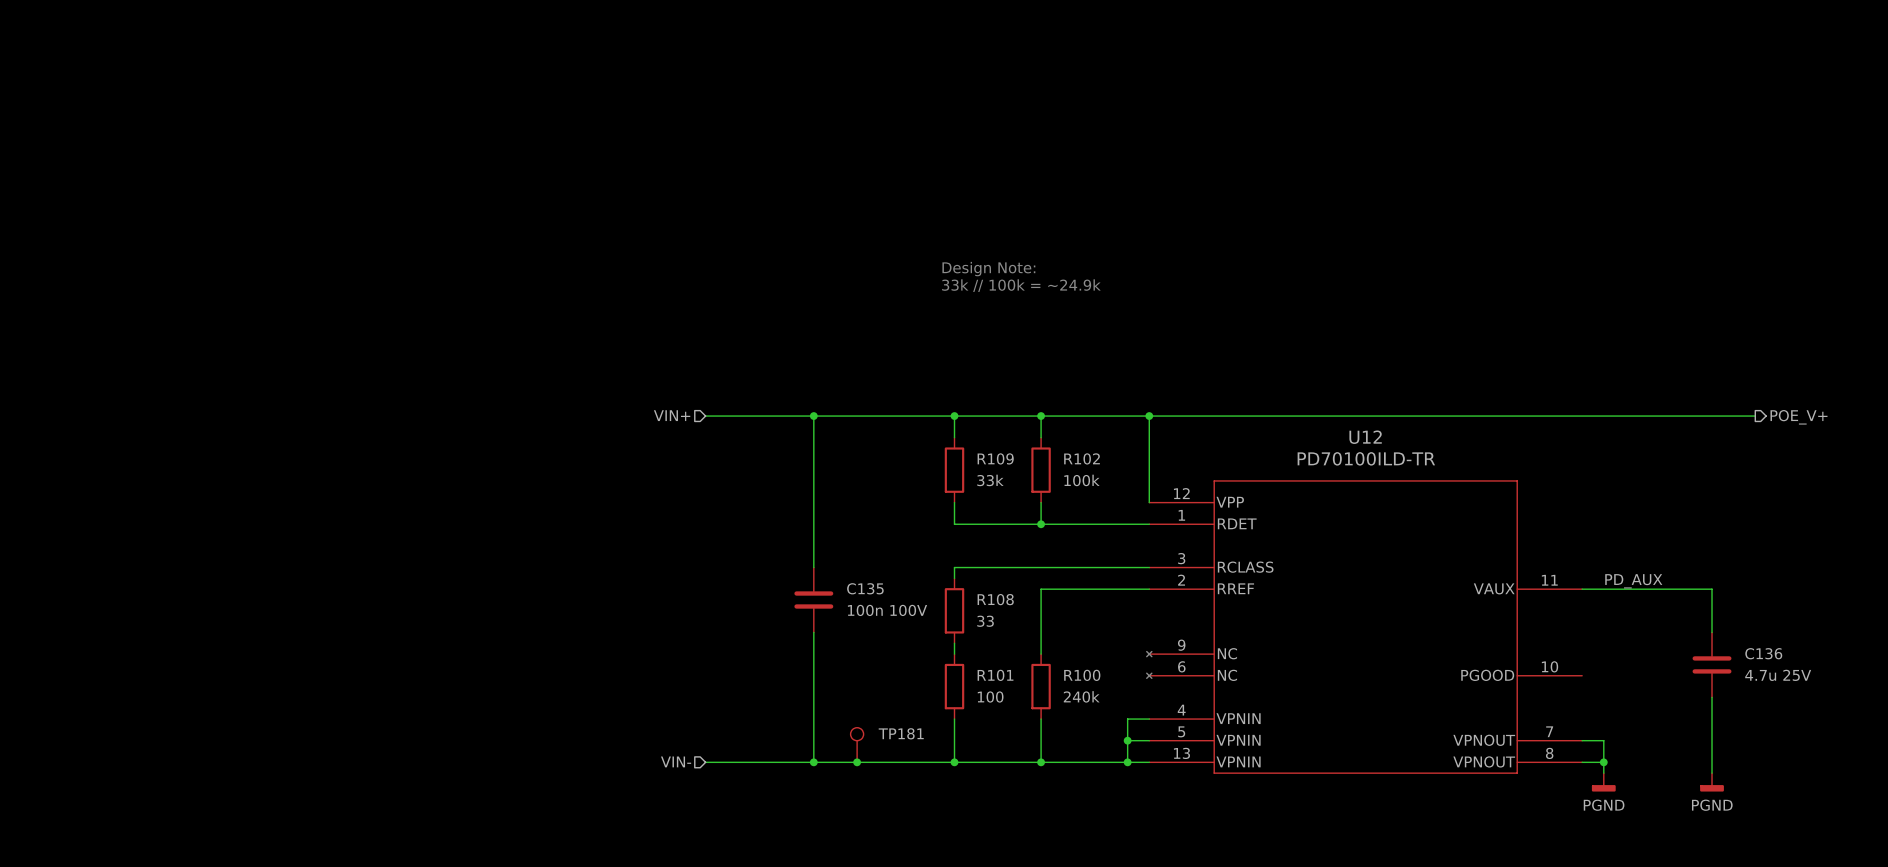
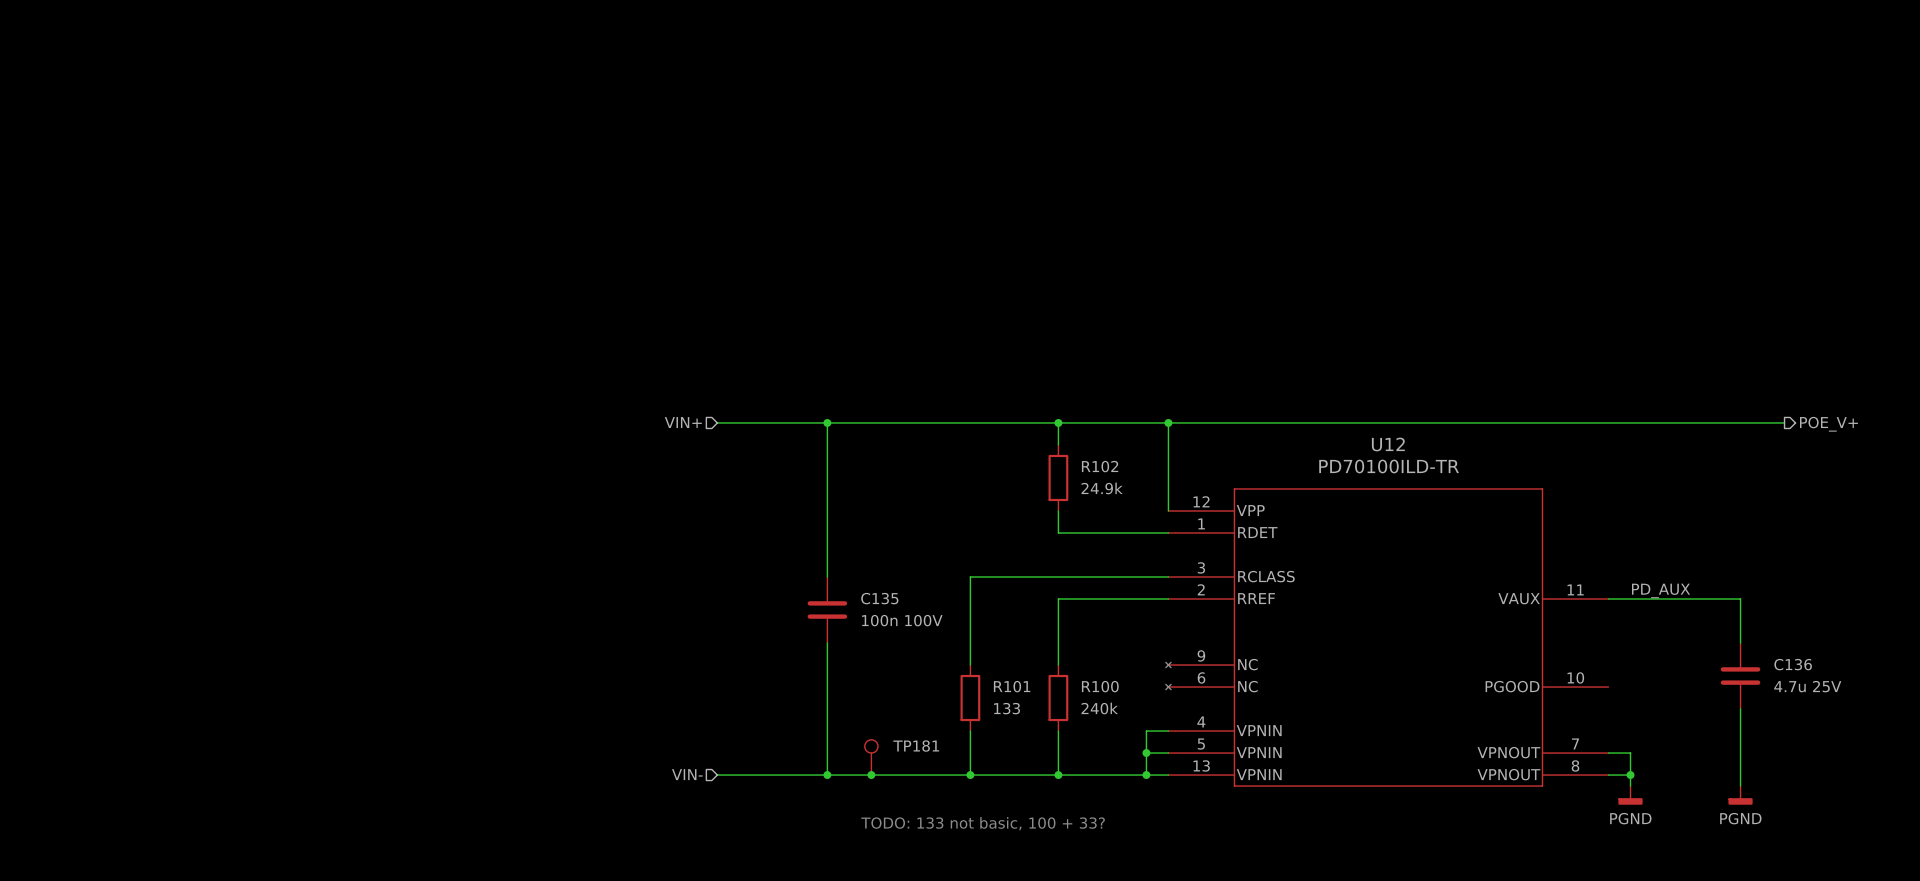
text: Design Note: (988, 269) -> none
text: 33k // 100k = ~24.9k (1021, 285) -> none
wire: (954, 416) (954, 437) -> none
junction: (954, 416) -> none
R109: 33k (954, 470) -> none
R102 value: 100k (1081, 480) -> 24.9k (1102, 488)
wire: (954, 502) (954, 524) (1041, 524) -> none
junction: (1041, 524) -> none
wire: none -> (970, 588) (970, 654)
R108: 33 (954, 610) -> none
R101 value: 100 (990, 697) -> 133 (1007, 708)
text: none -> TODO: 133 not basic, 100 + 33? (983, 823)

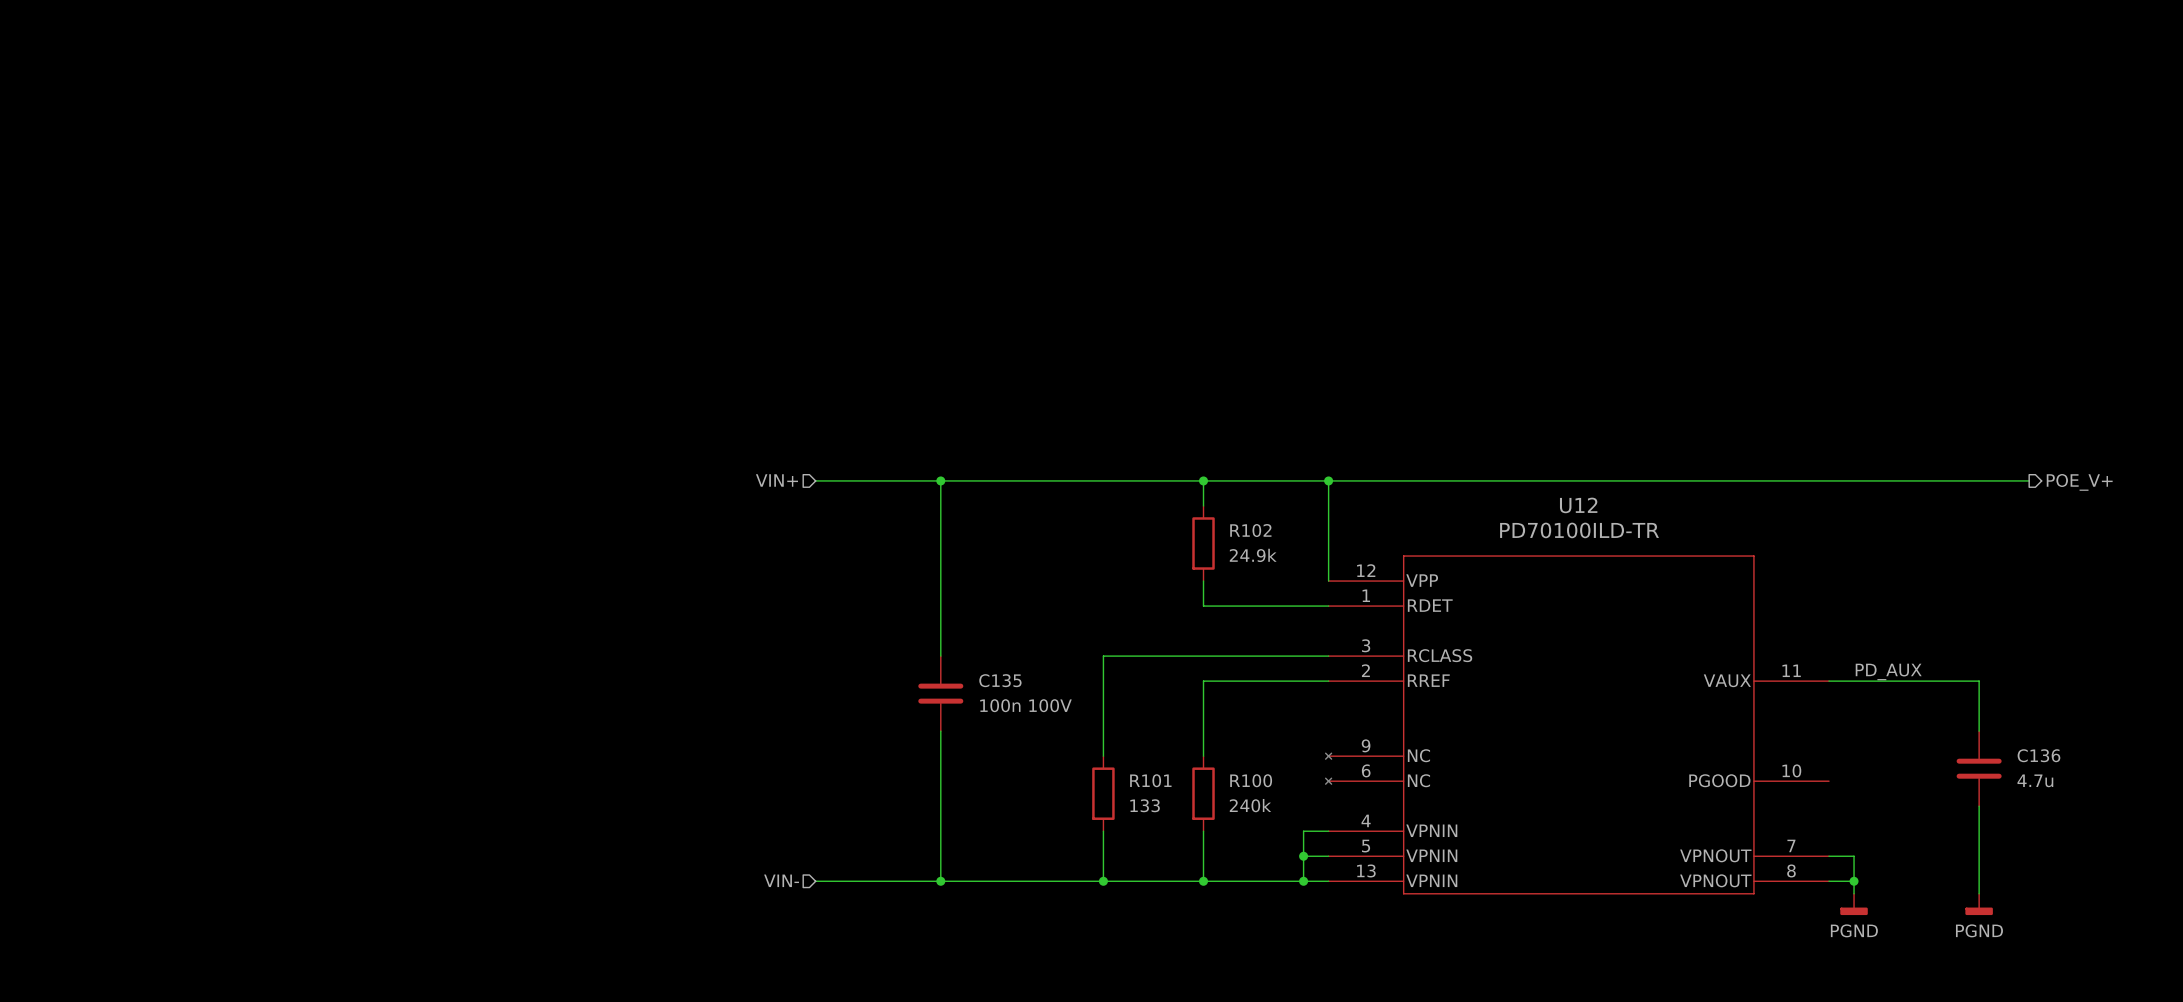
C136 value: 4.7u 25V (1807, 686) -> 4.7u (2035, 780)
TP181: (871, 757) -> none
junction: (871, 775) -> none
text: TODO: 133 not basic, 100 + 33? (983, 823) -> none

